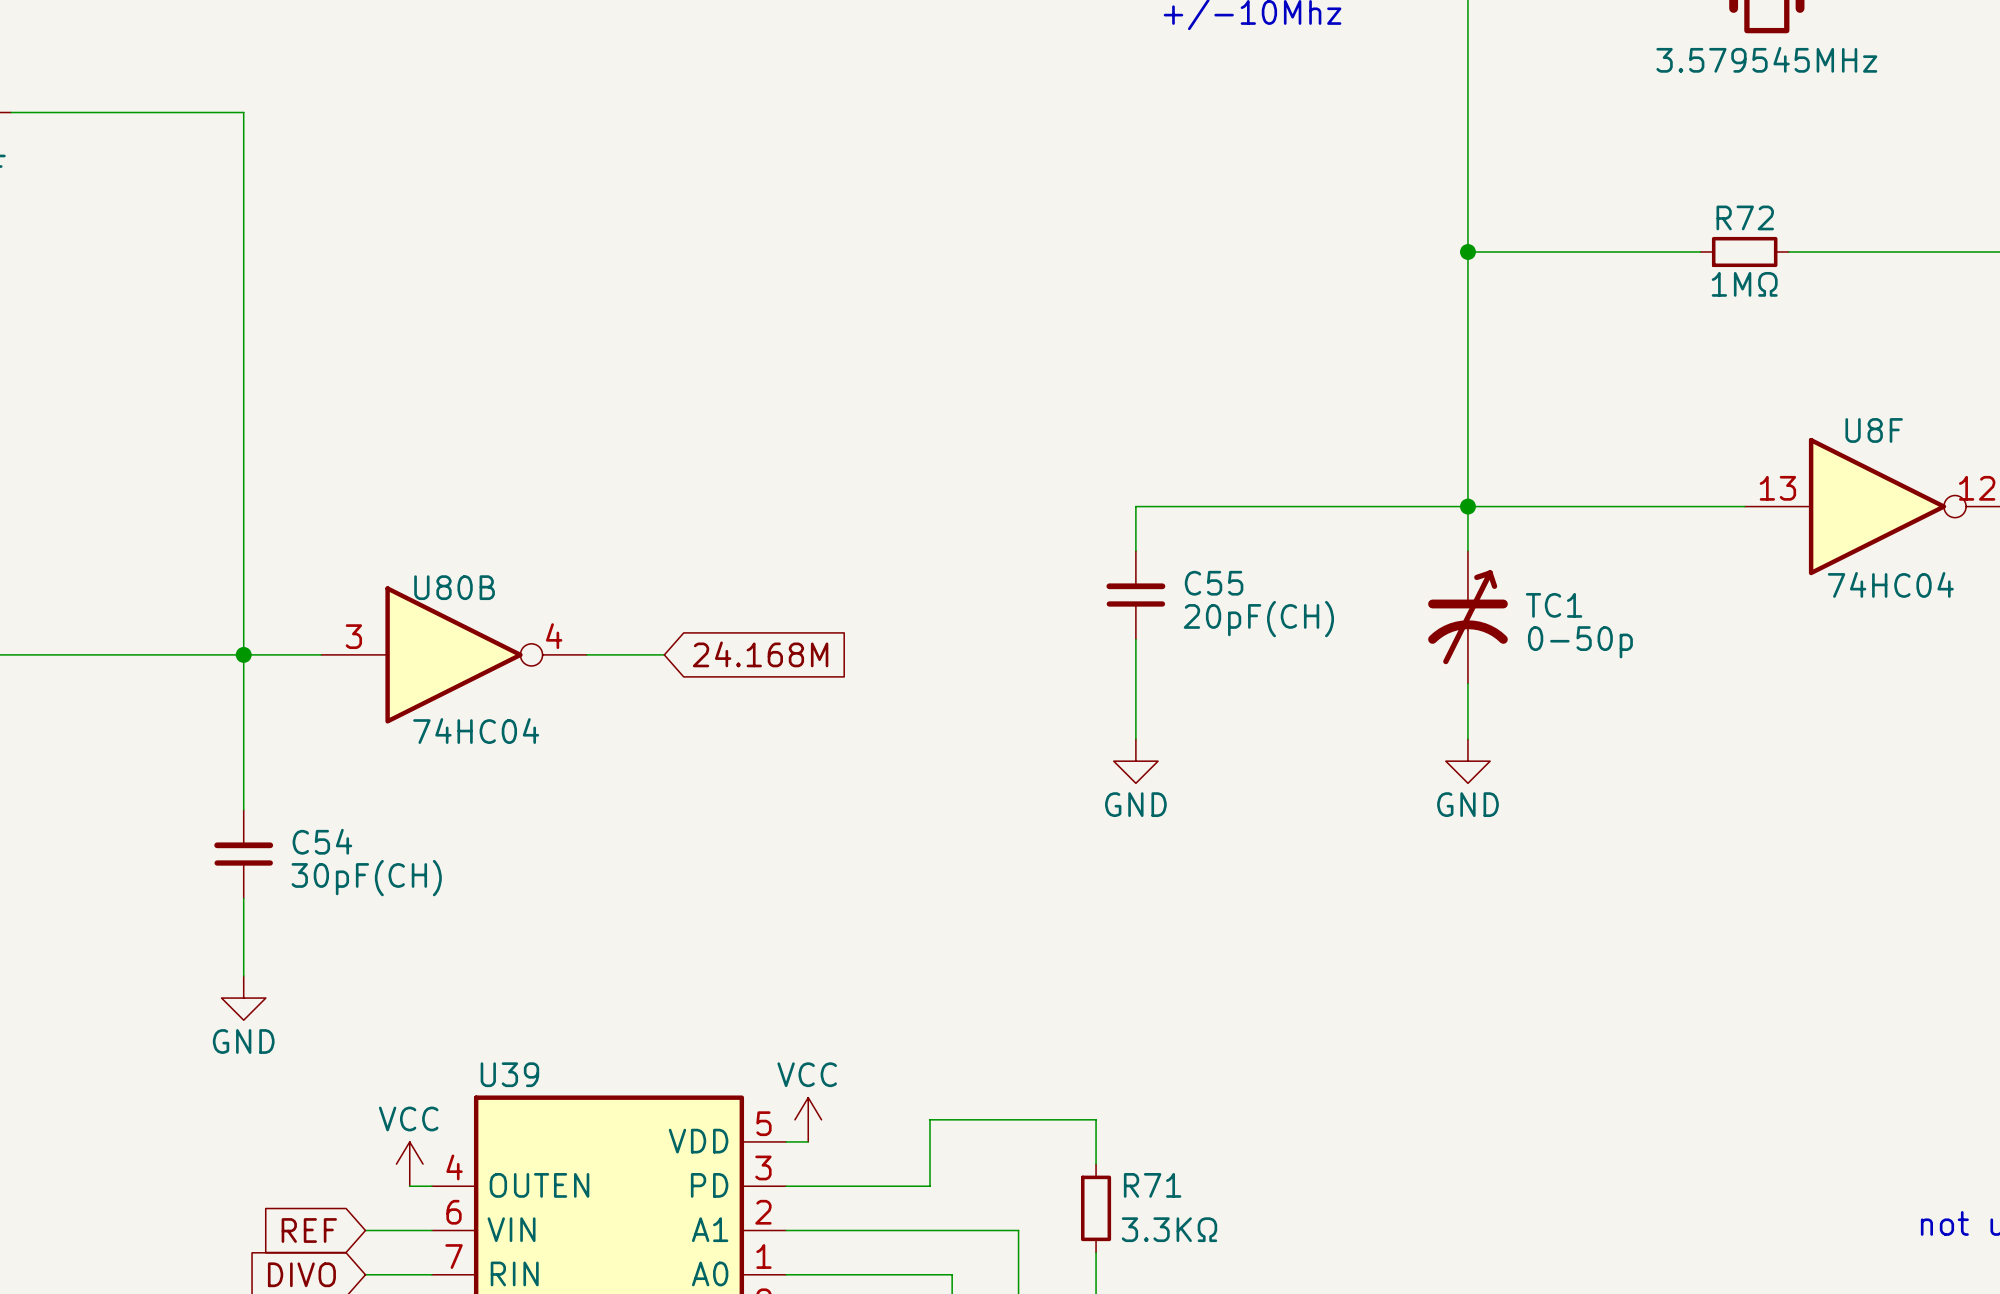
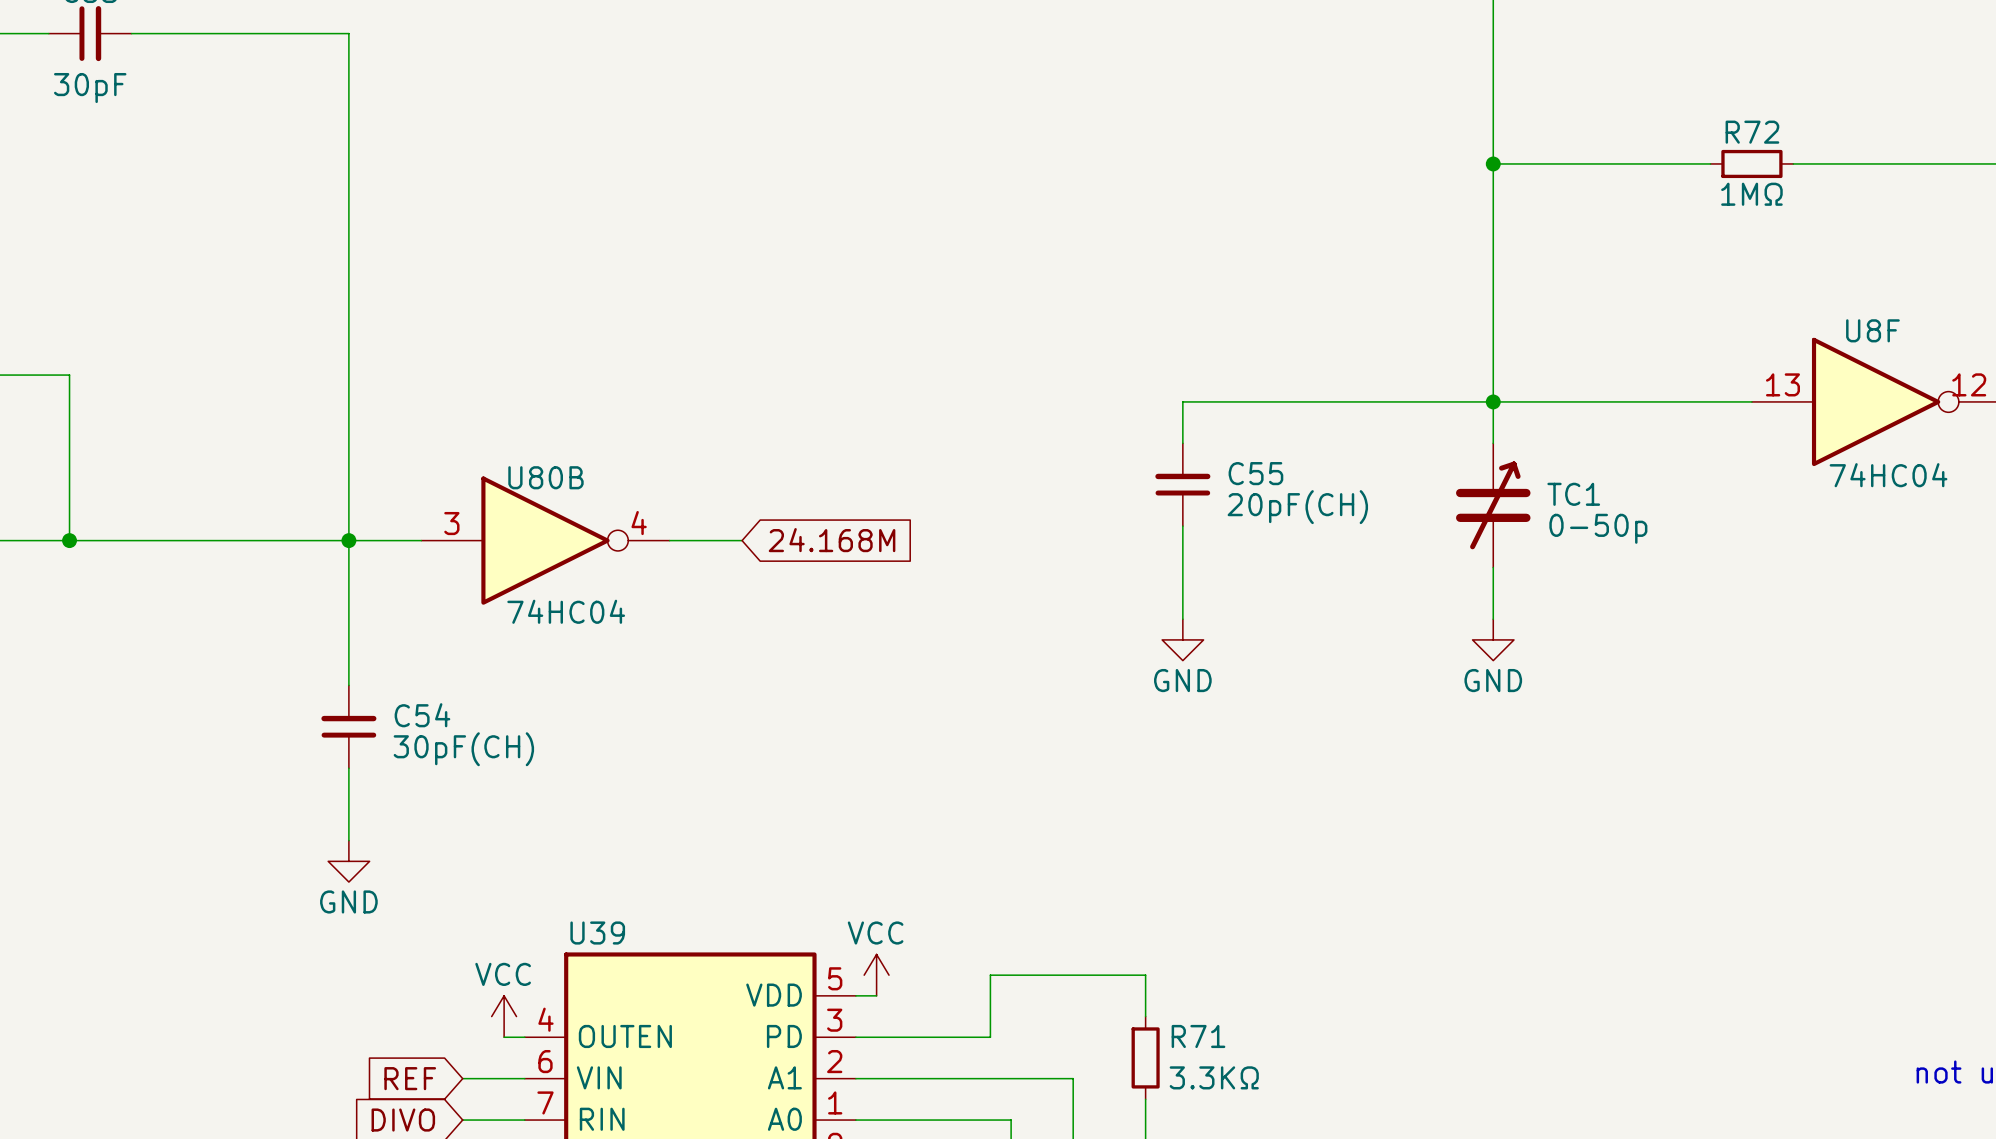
TC1 symbol: [1428, 550, 1508, 684] -> [1456, 443, 1531, 568]

